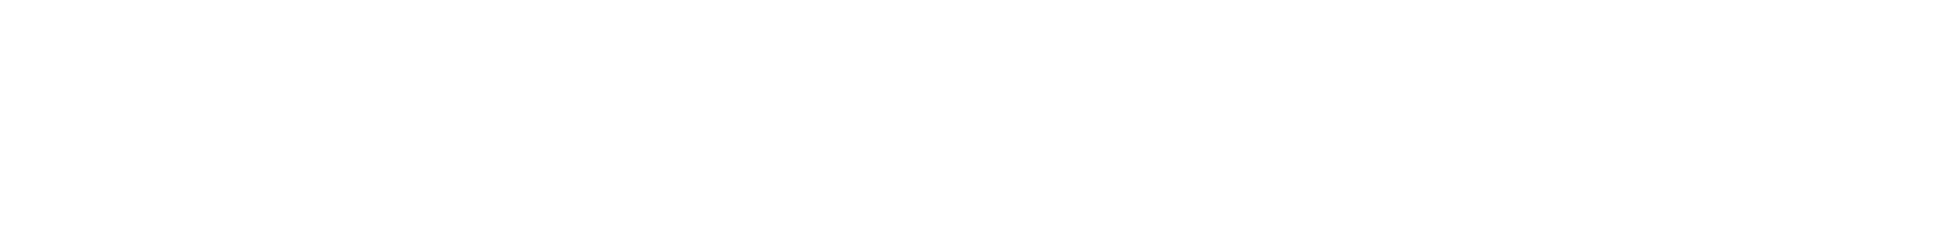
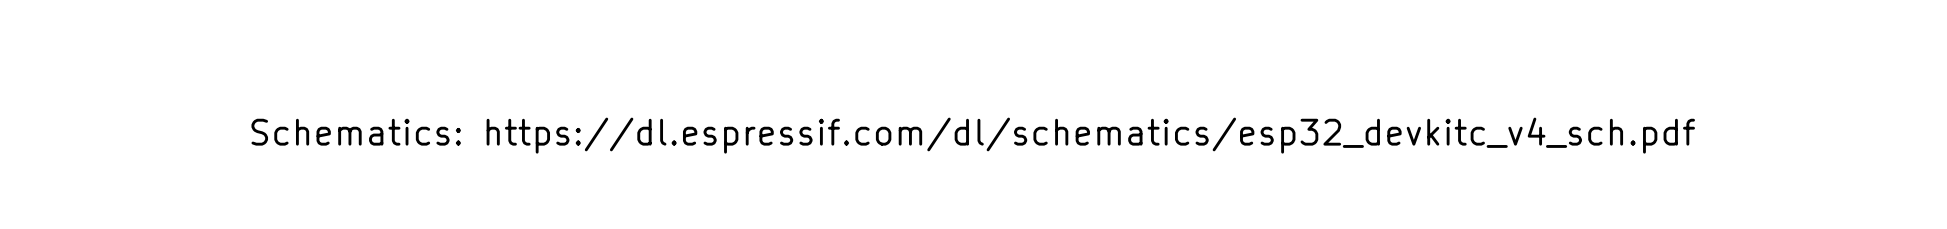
text: none -> Schematics: https://dl.espressif.com/dl/schematics/esp32_devkitc_v4_sch.pdf (973, 135)

